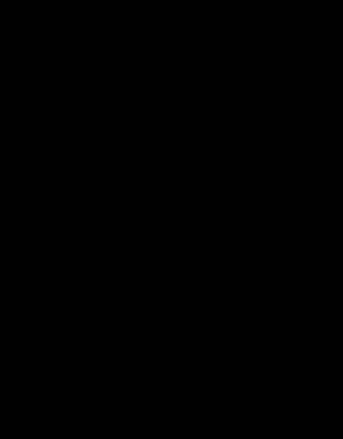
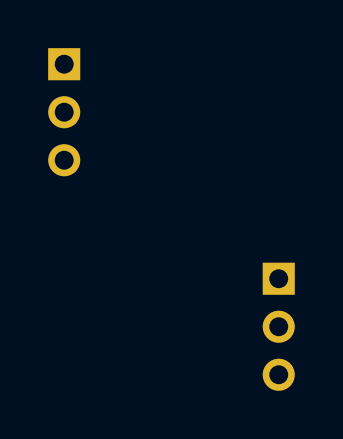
part: none -> (64, 112)
part: none -> (278, 326)

